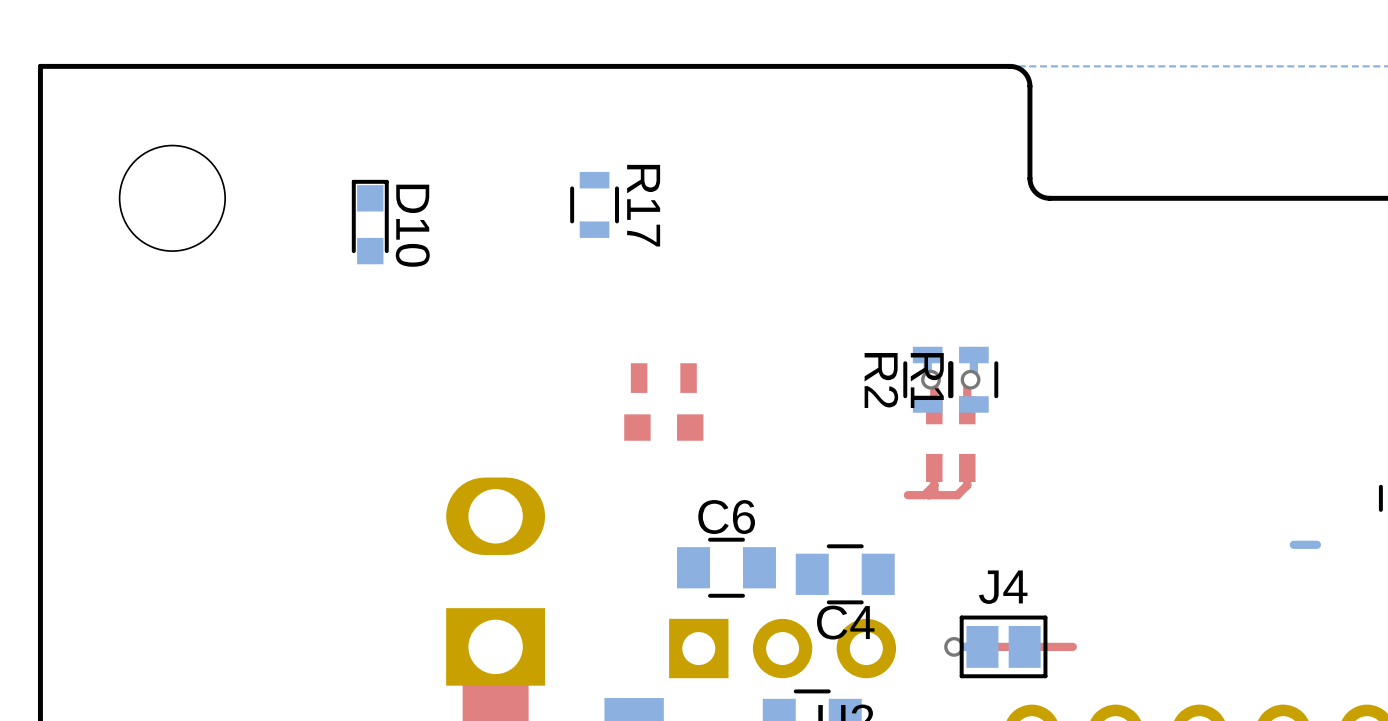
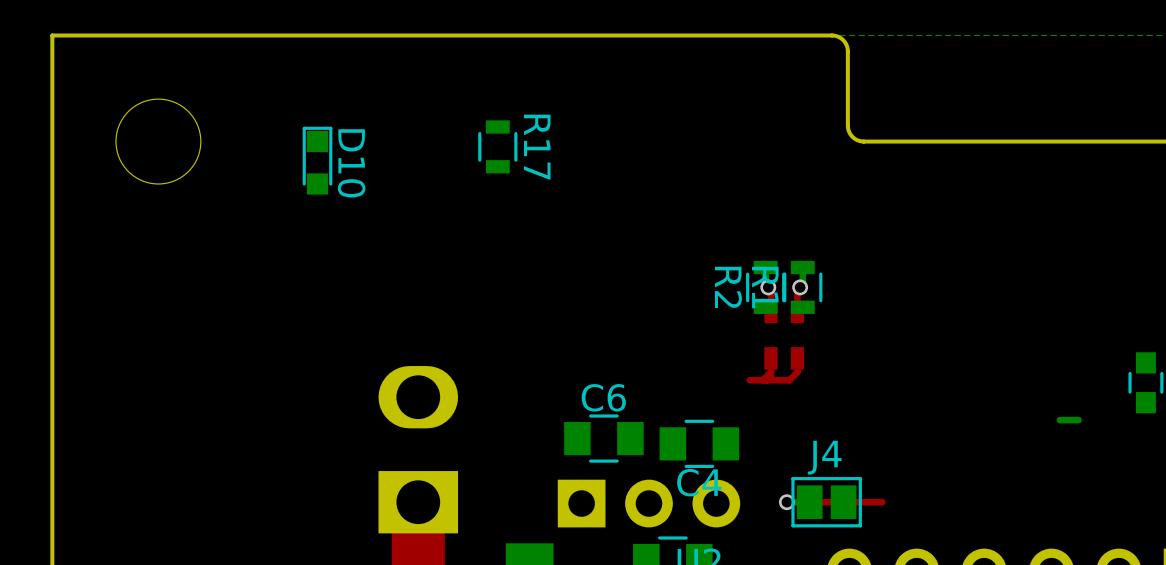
part: (663, 378) -> none
part: (663, 427) -> none

